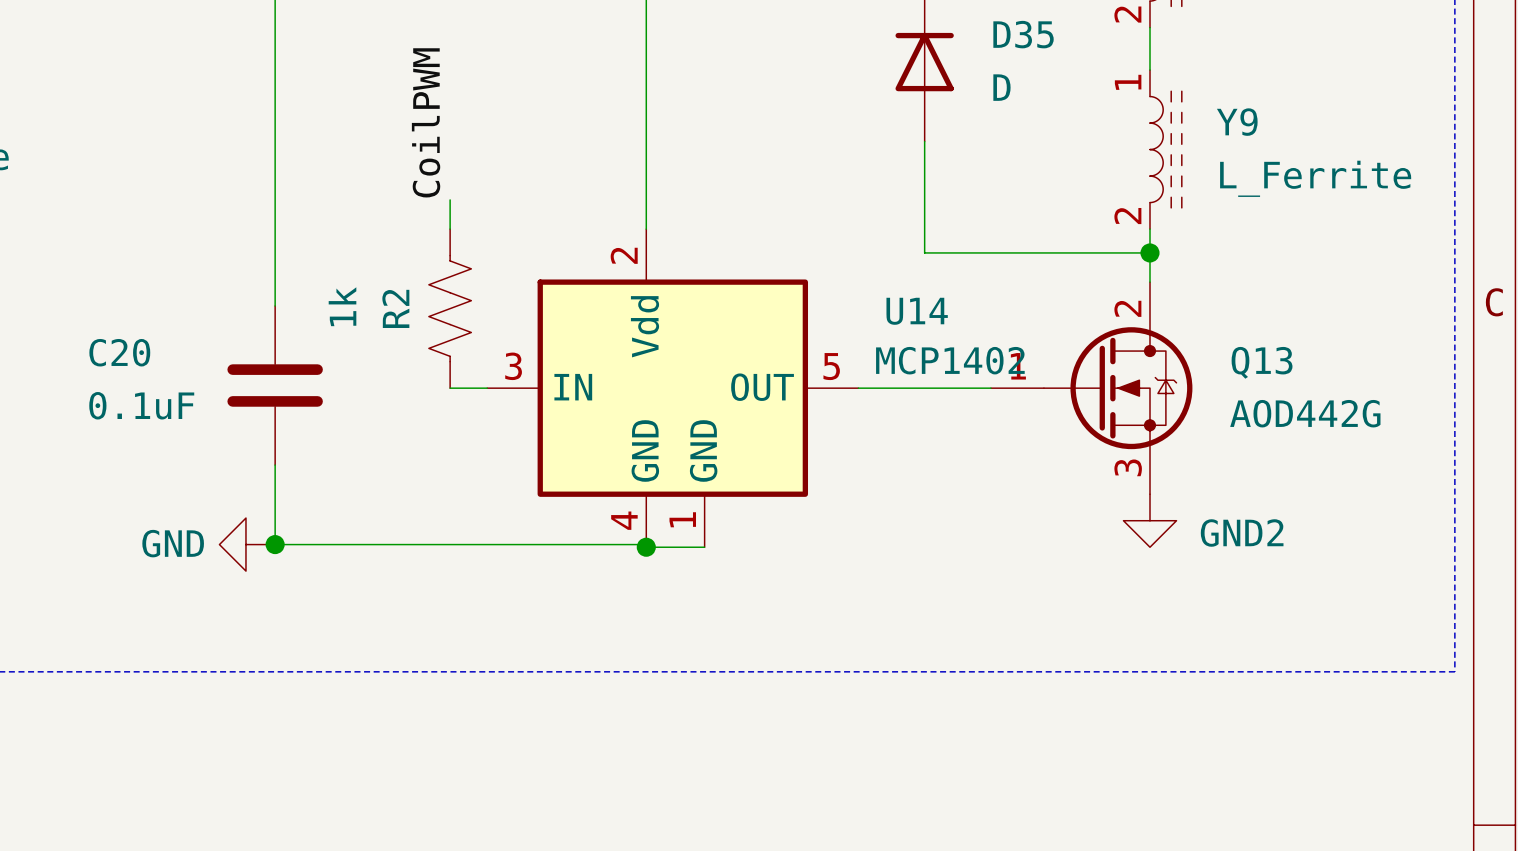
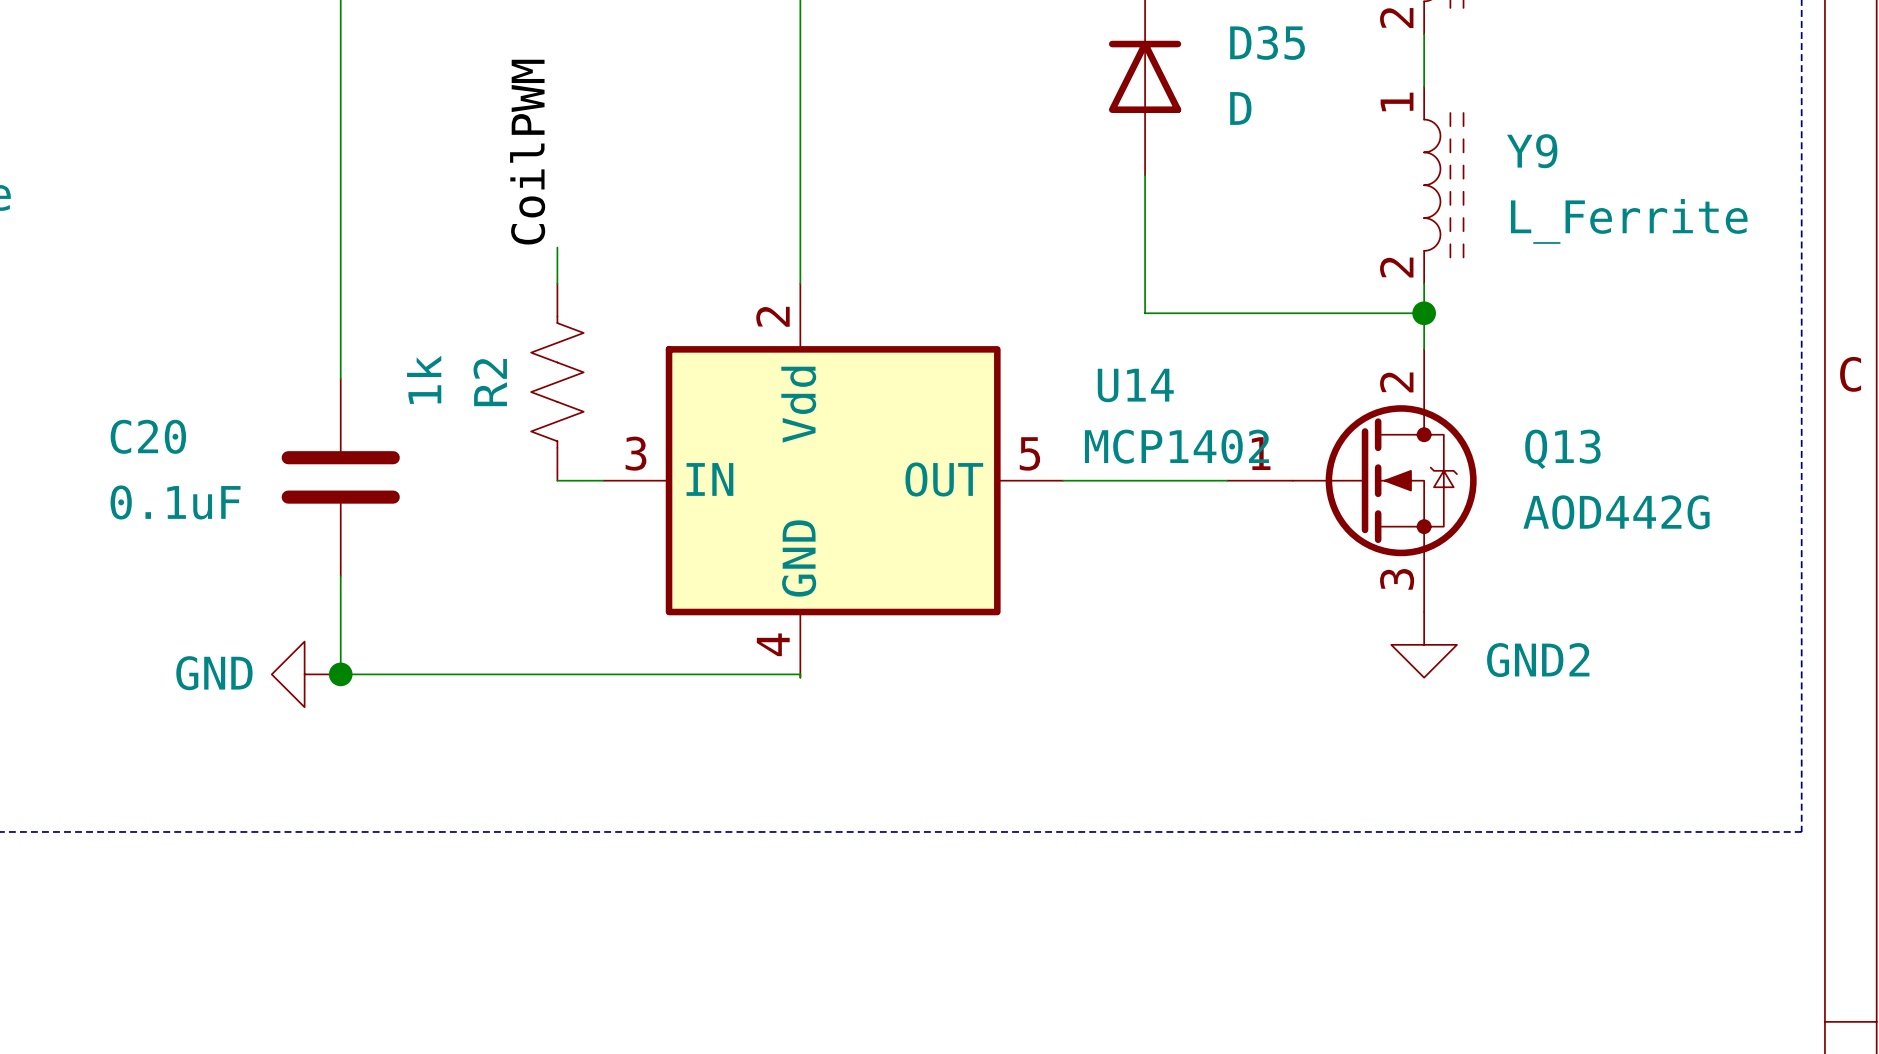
U14 symbol: [487, 229, 859, 548] -> [603, 283, 1063, 678]
wire: (646, 547) (704, 547) -> none
junction: (646, 547) -> none

